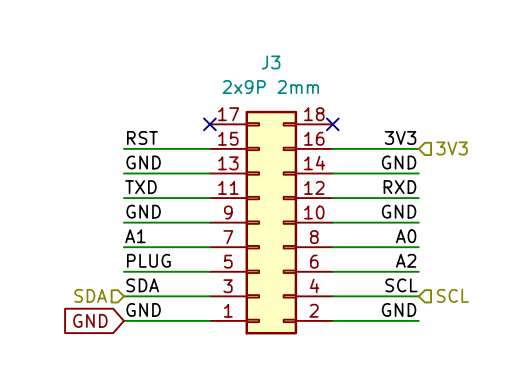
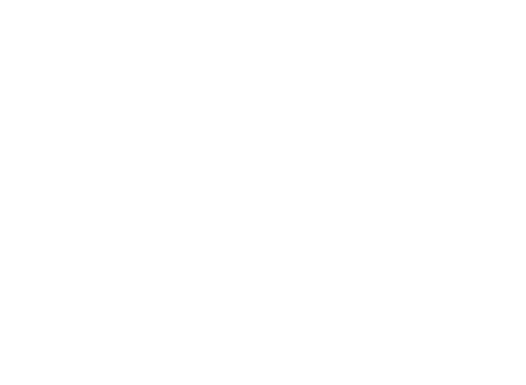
no-connect mark: (209, 124) -> none
no-connect mark: (332, 124) -> none
label: RST (142, 137) -> none
label: 3V3 (400, 137) -> none
wire: (123, 148) (209, 148) -> none
wire: (332, 148) (418, 148) -> none
hierarchical label: 3V3 (452, 148) -> none
label: GND (143, 162) -> none
label: GND (399, 162) -> none
wire: (123, 173) (209, 173) -> none
wire: (332, 173) (418, 173) -> none
label: TXD (140, 187) -> none
label: RXD (399, 187) -> none
wire: (123, 198) (209, 198) -> none
wire: (332, 198) (418, 198) -> none
label: GND (143, 211) -> none
label: GND (399, 211) -> none
wire: (123, 222) (209, 222) -> none
J3: 2x9P 2mm (271, 222) -> none
wire: (332, 222) (418, 222) -> none
label: A1 (135, 236) -> none
label: A0 (406, 236) -> none
wire: (123, 247) (209, 247) -> none
wire: (332, 247) (418, 247) -> none
label: PLUG (148, 260) -> none
label: A2 (406, 260) -> none
wire: (123, 271) (209, 271) -> none
wire: (332, 271) (418, 271) -> none
label: SDA (142, 285) -> none
label: SCL (401, 285) -> none
hierarchical label: SDA (90, 295) -> none
hierarchical label: SCL (452, 295) -> none
wire: (123, 296) (209, 296) -> none
wire: (332, 296) (418, 296) -> none
label: GND (143, 309) -> none
label: GND (399, 309) -> none
global label: GND (90, 320) -> none
wire: (123, 320) (209, 320) -> none
wire: (332, 320) (418, 320) -> none

